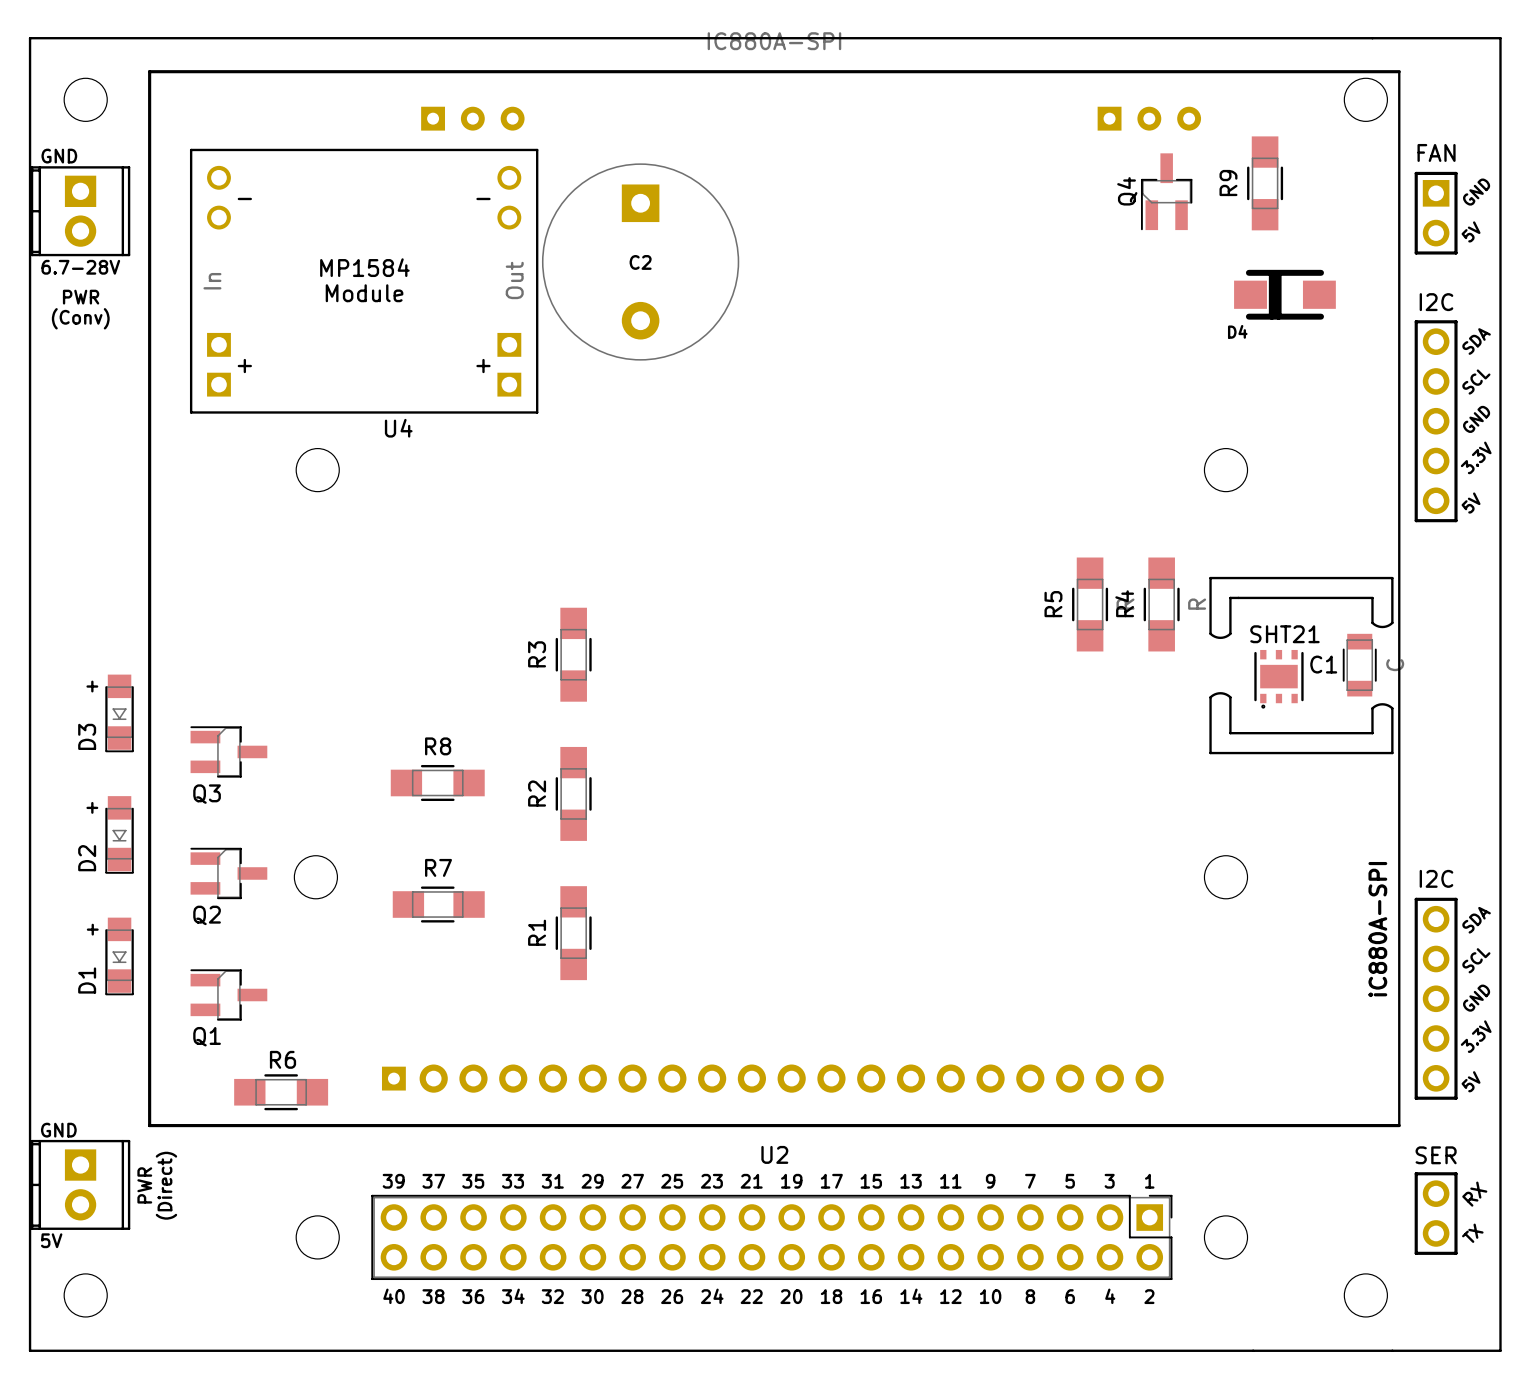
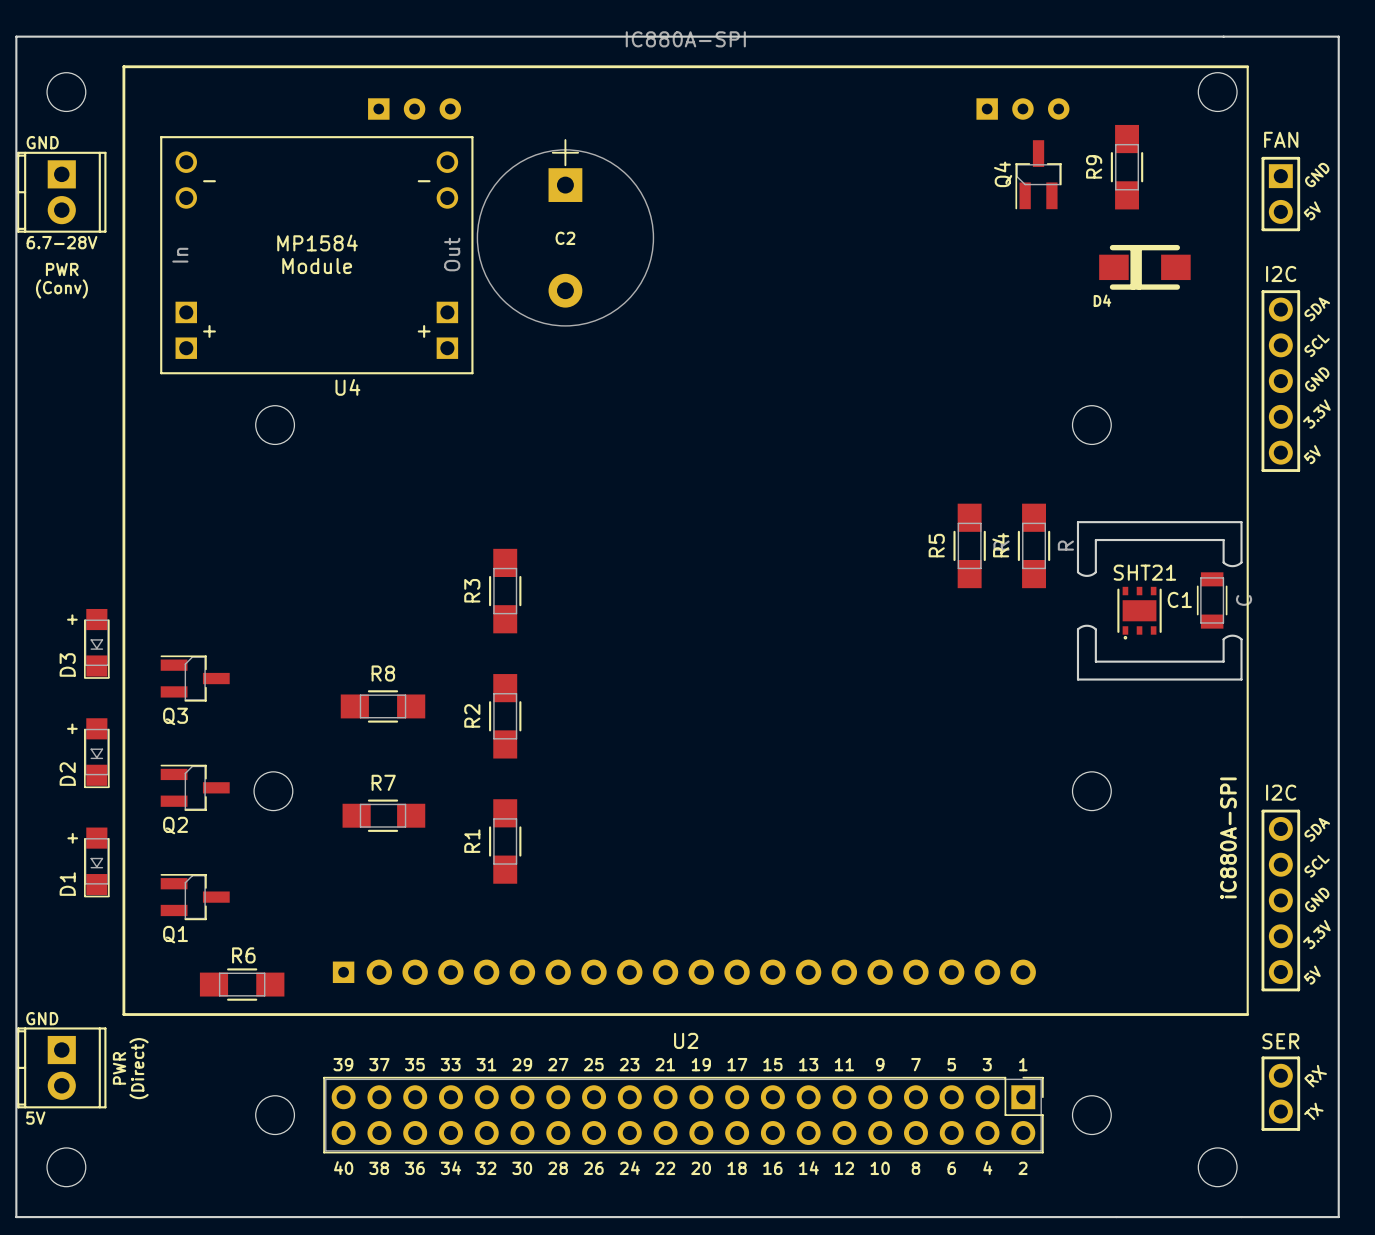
part footprint: [541, 163, 740, 361] -> [476, 139, 655, 327]

